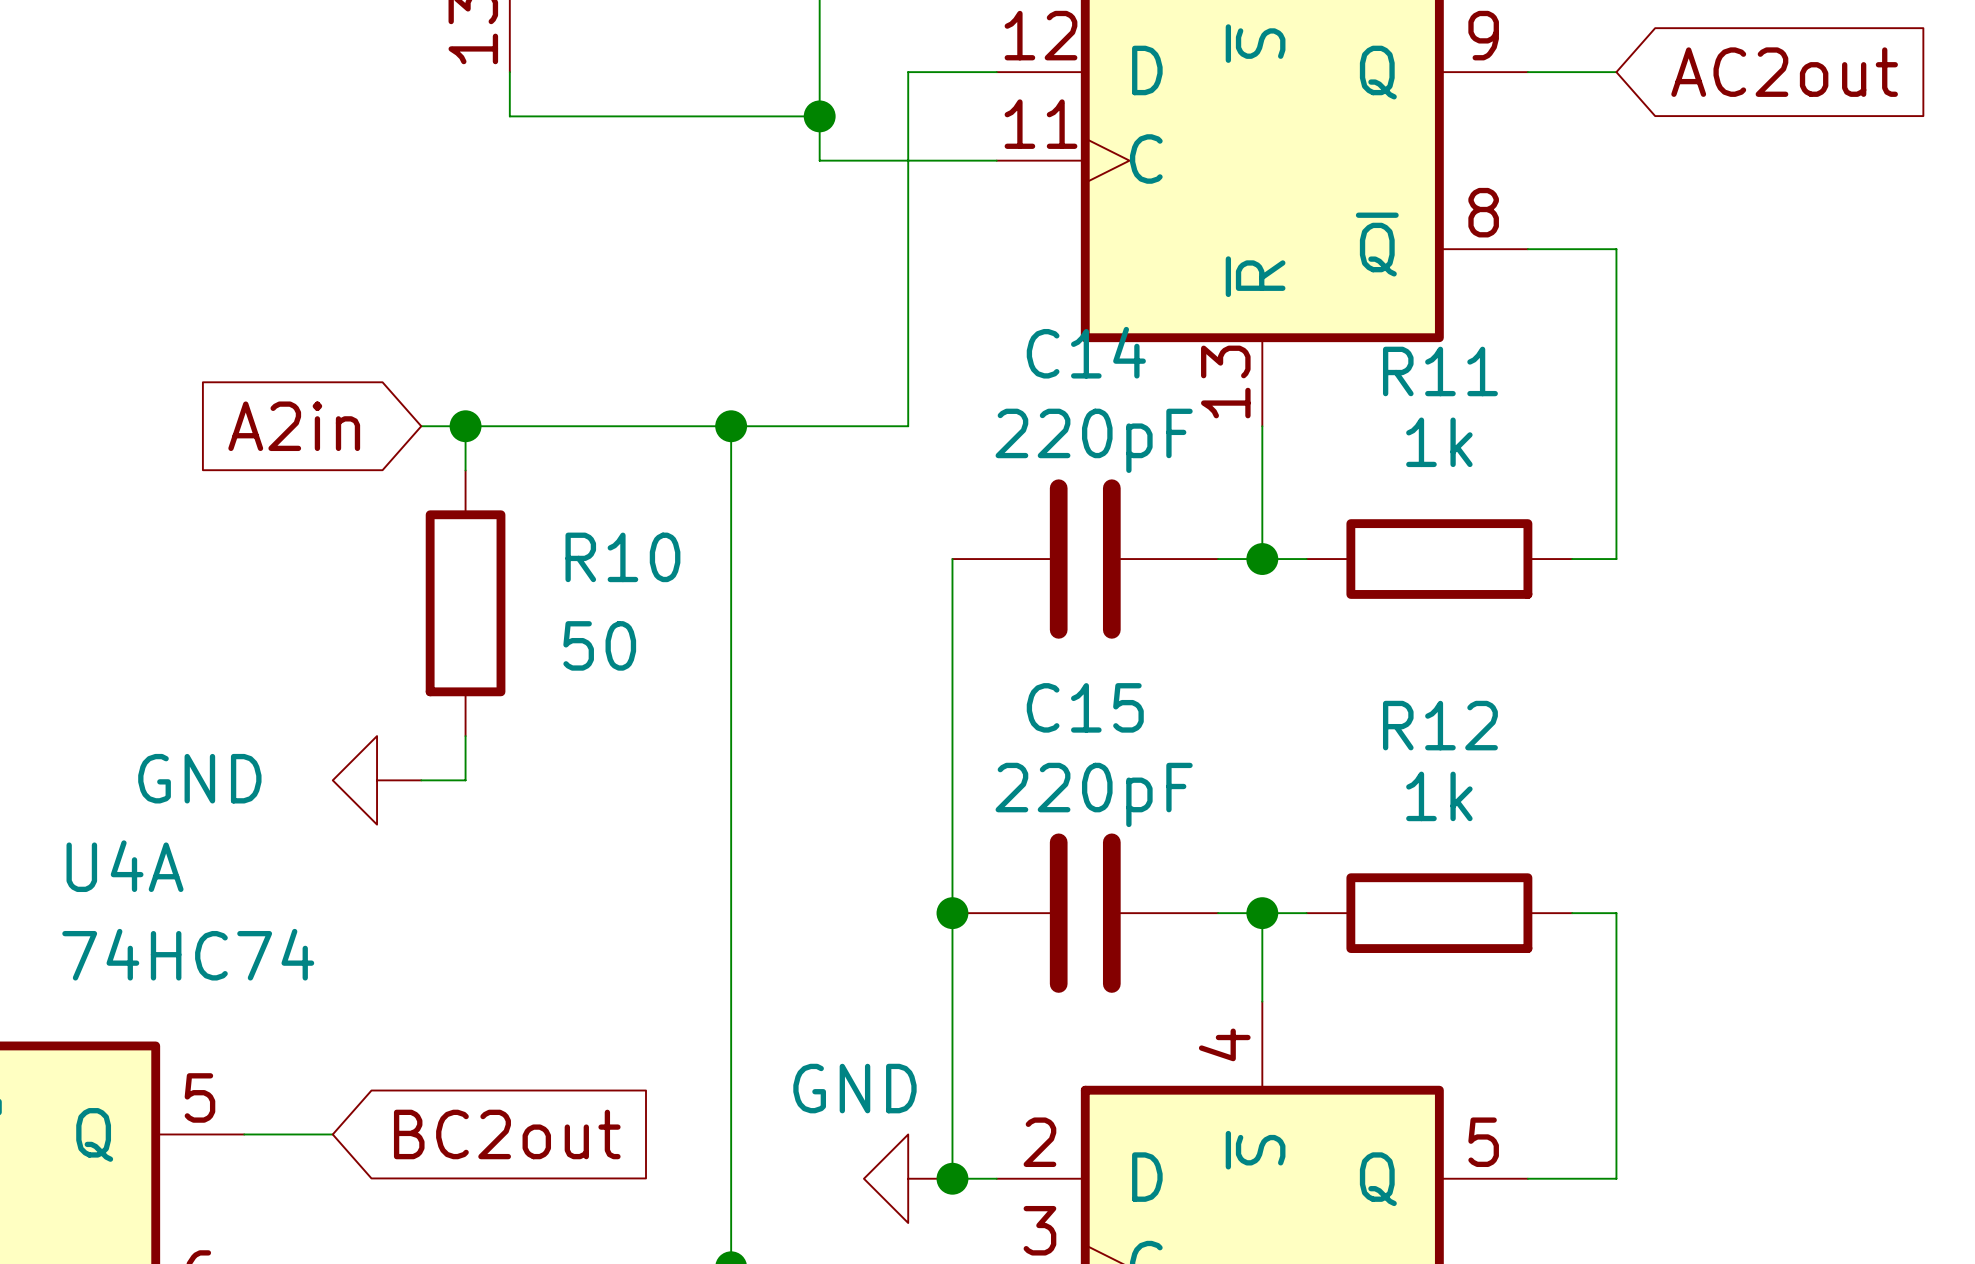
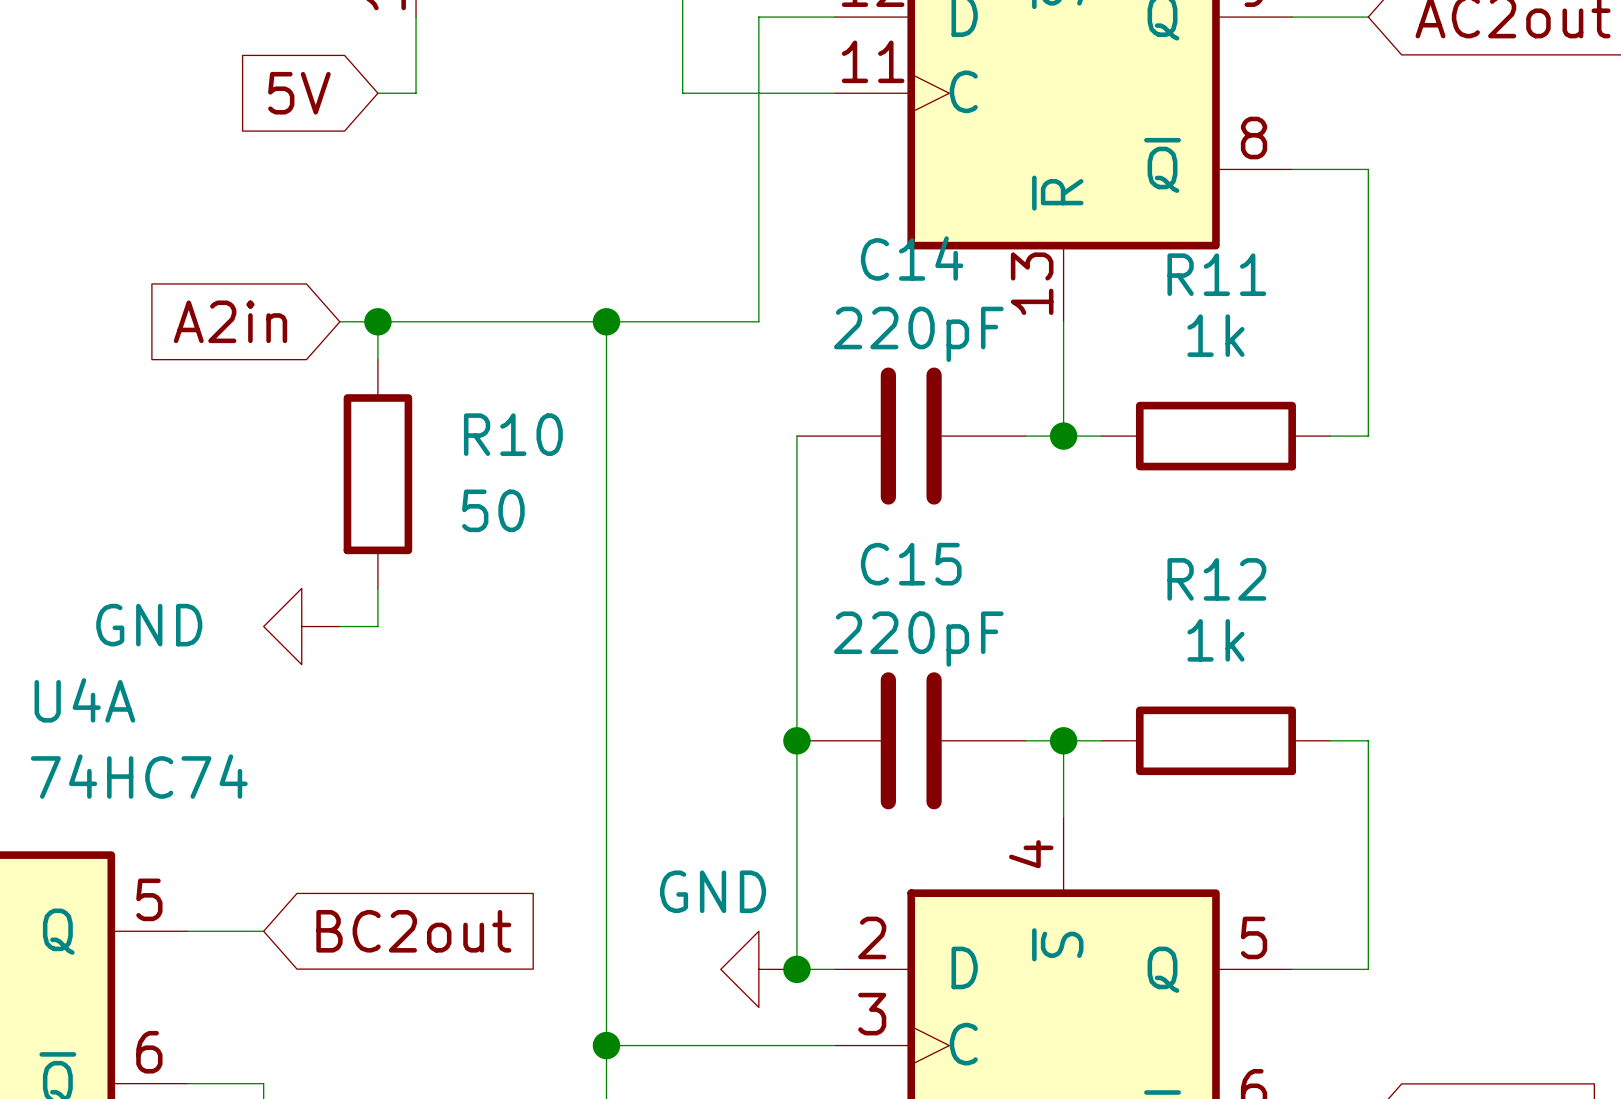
wire: (509, 116) (819, 116) -> (416, 55) (416, 93) (377, 93)
junction: (819, 116) -> none
global label: none -> 5V (299, 93)

